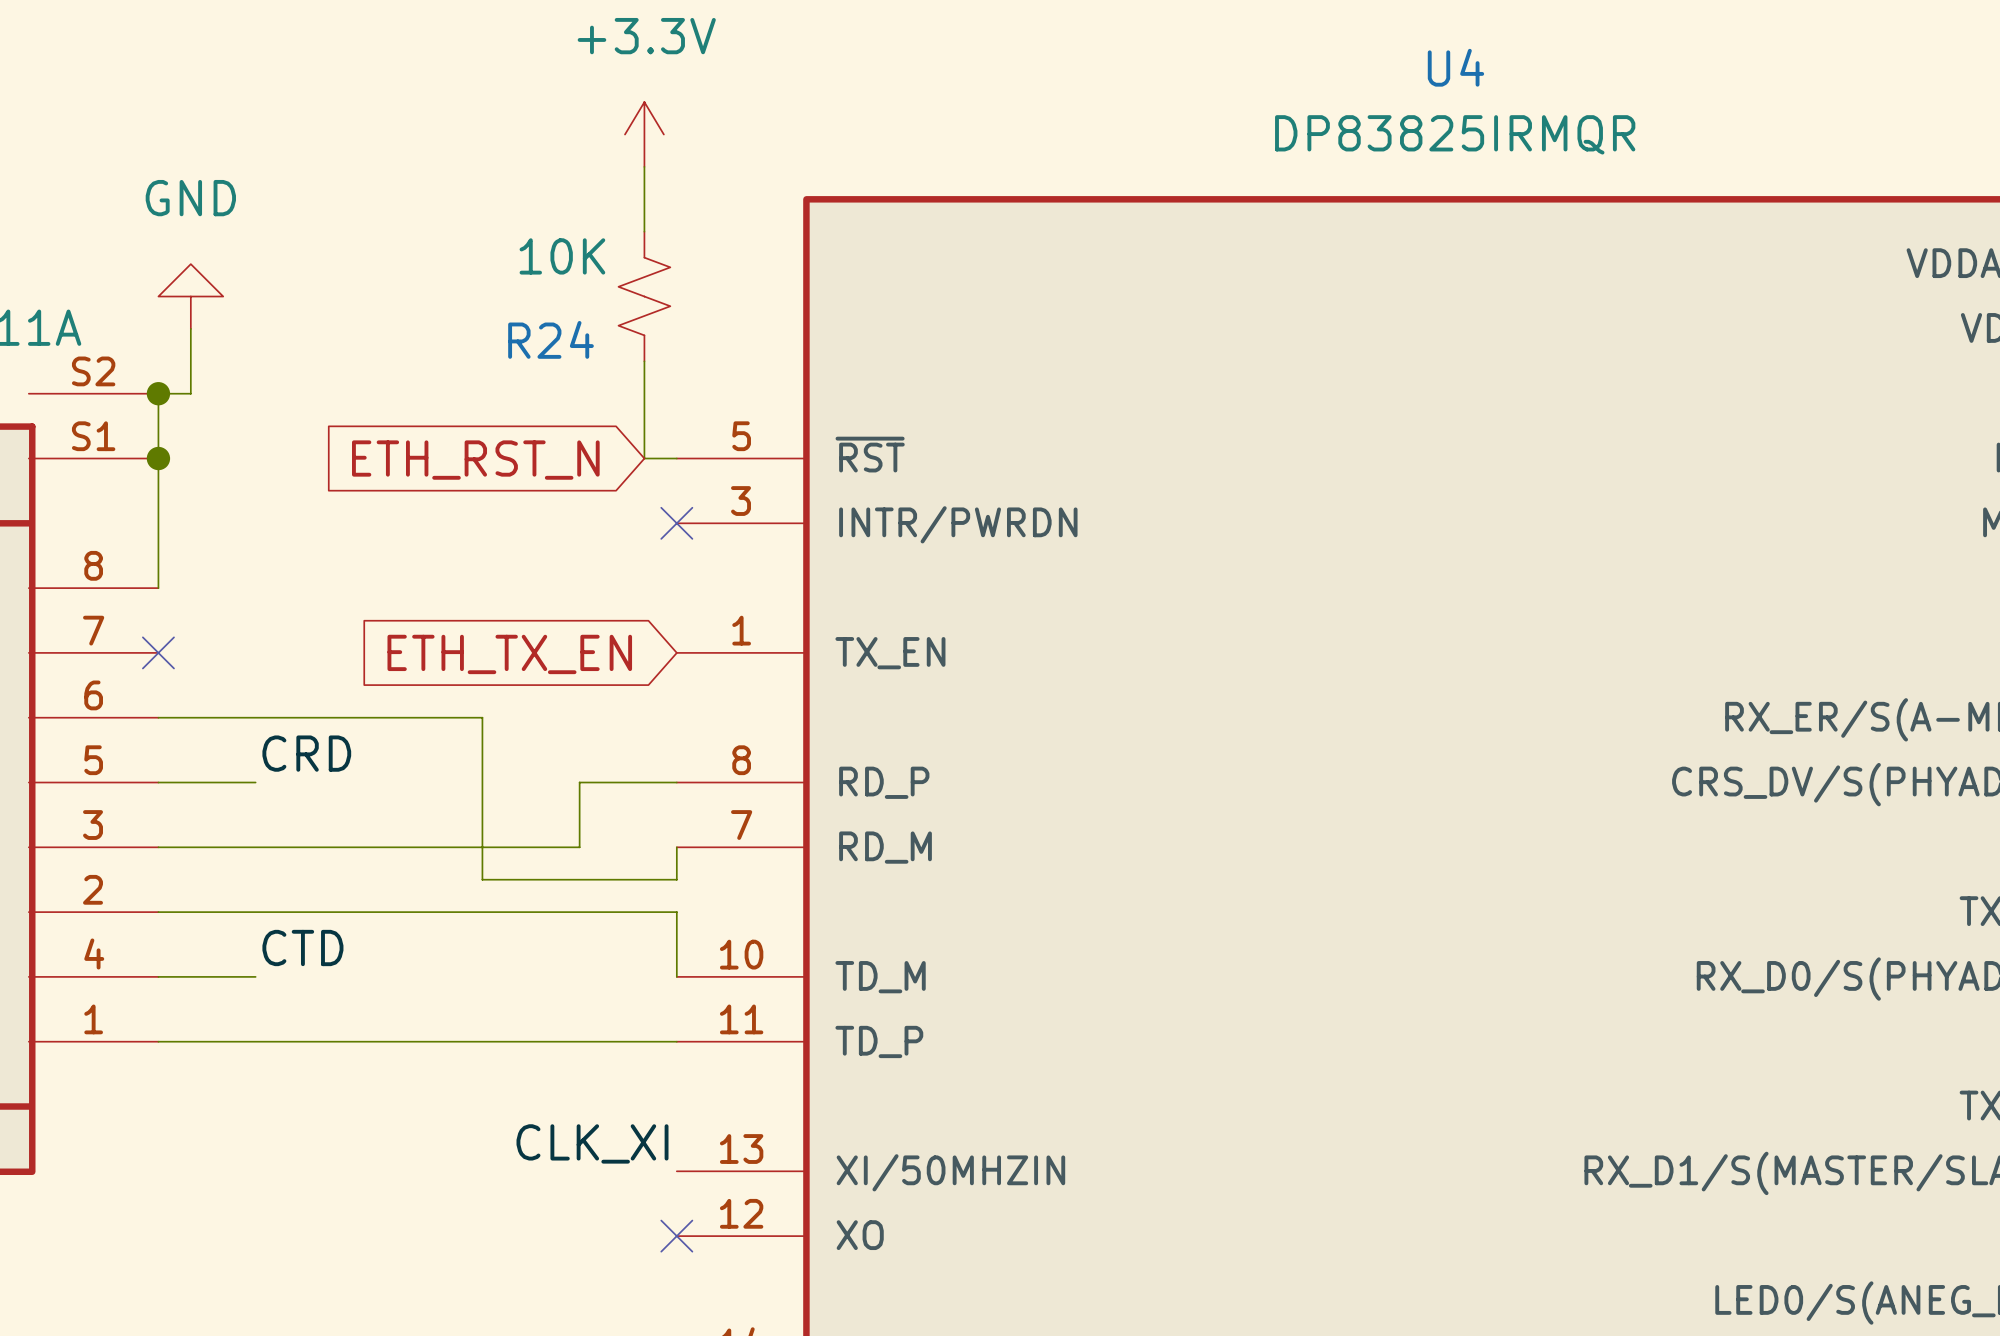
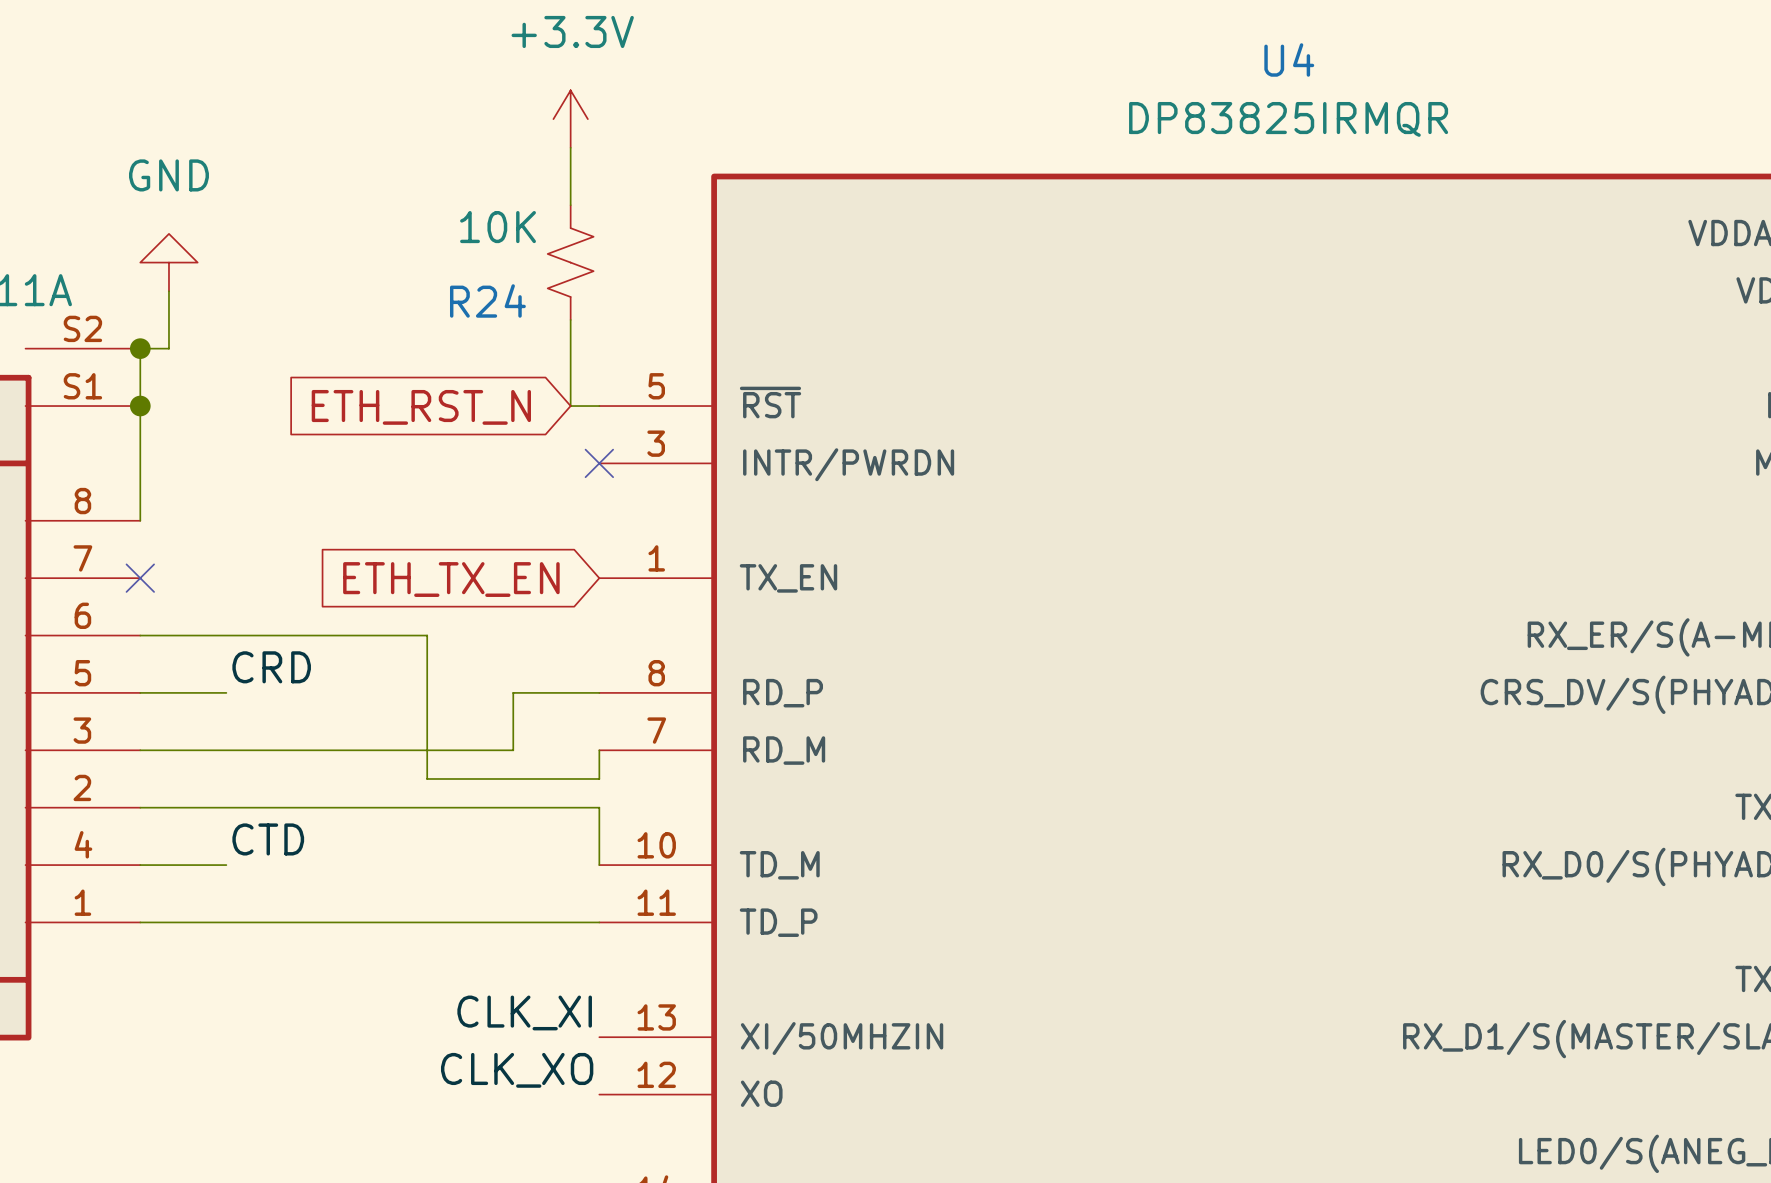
label: none -> CLK_XO (517, 1070)
no-connect mark: (676, 1236) -> none

